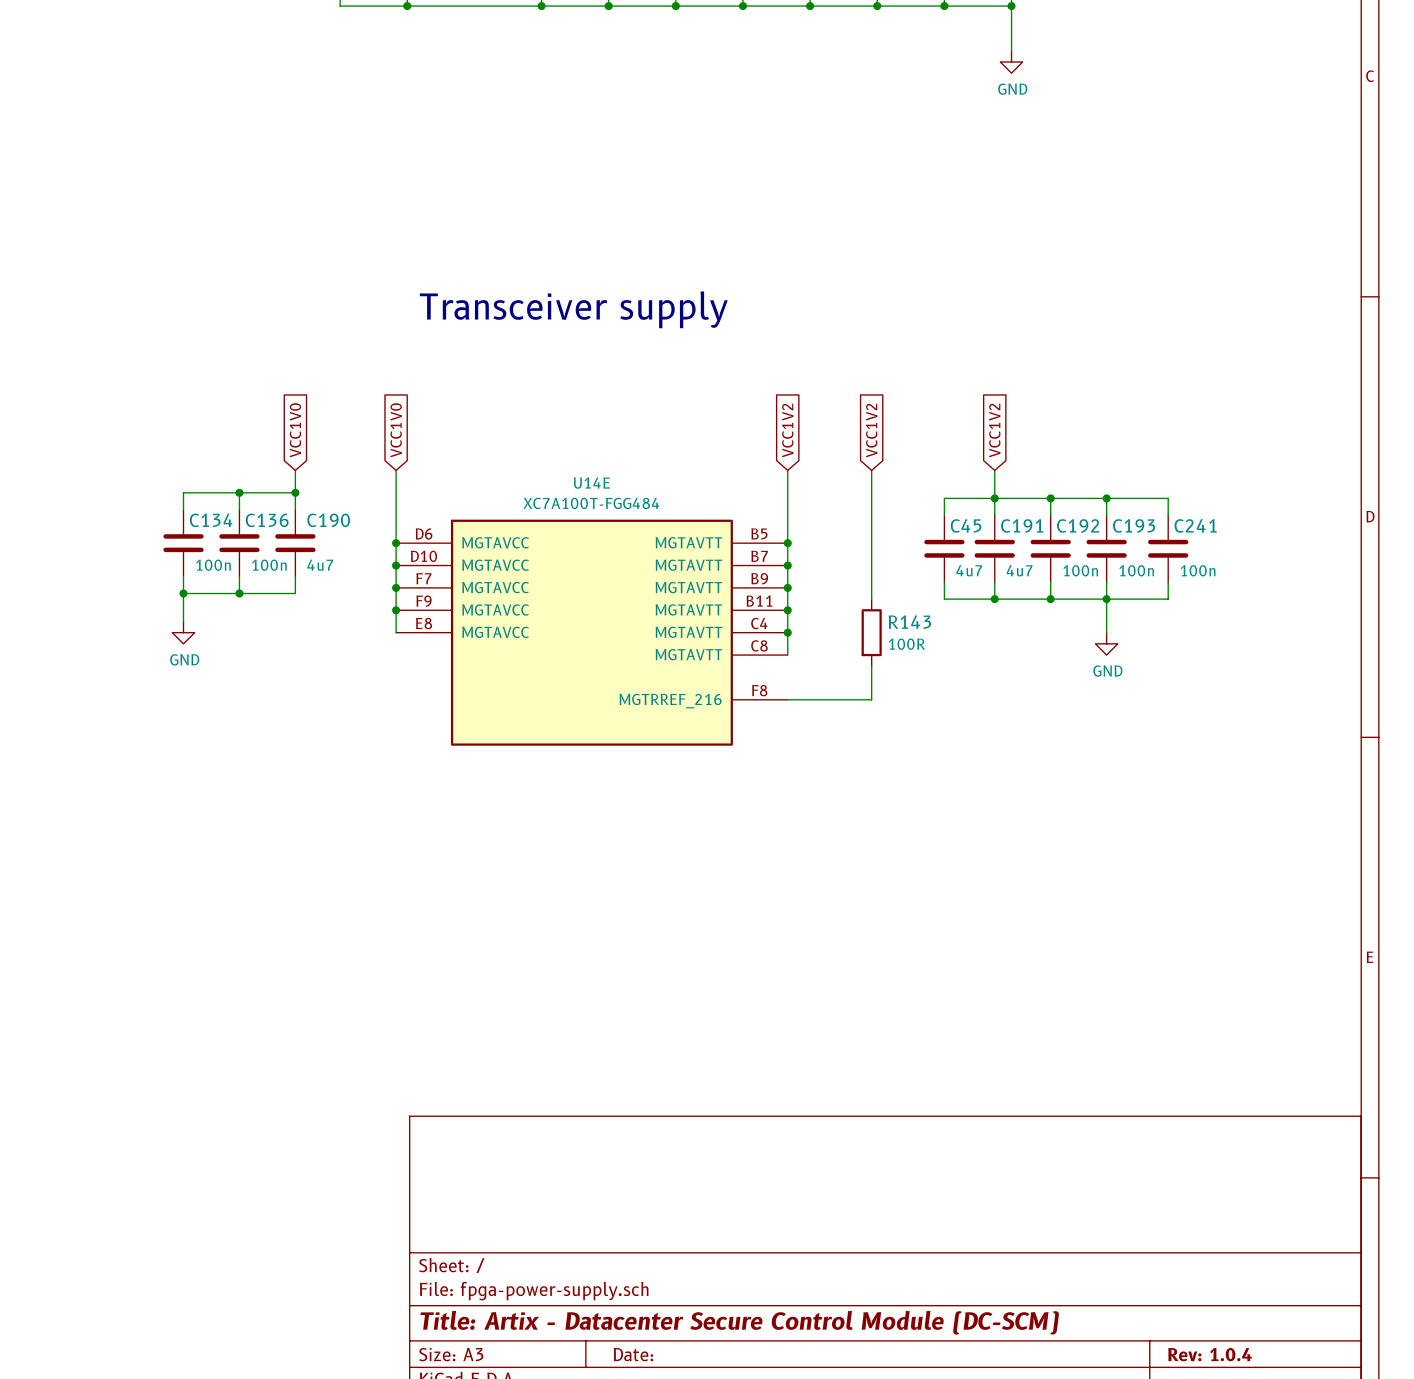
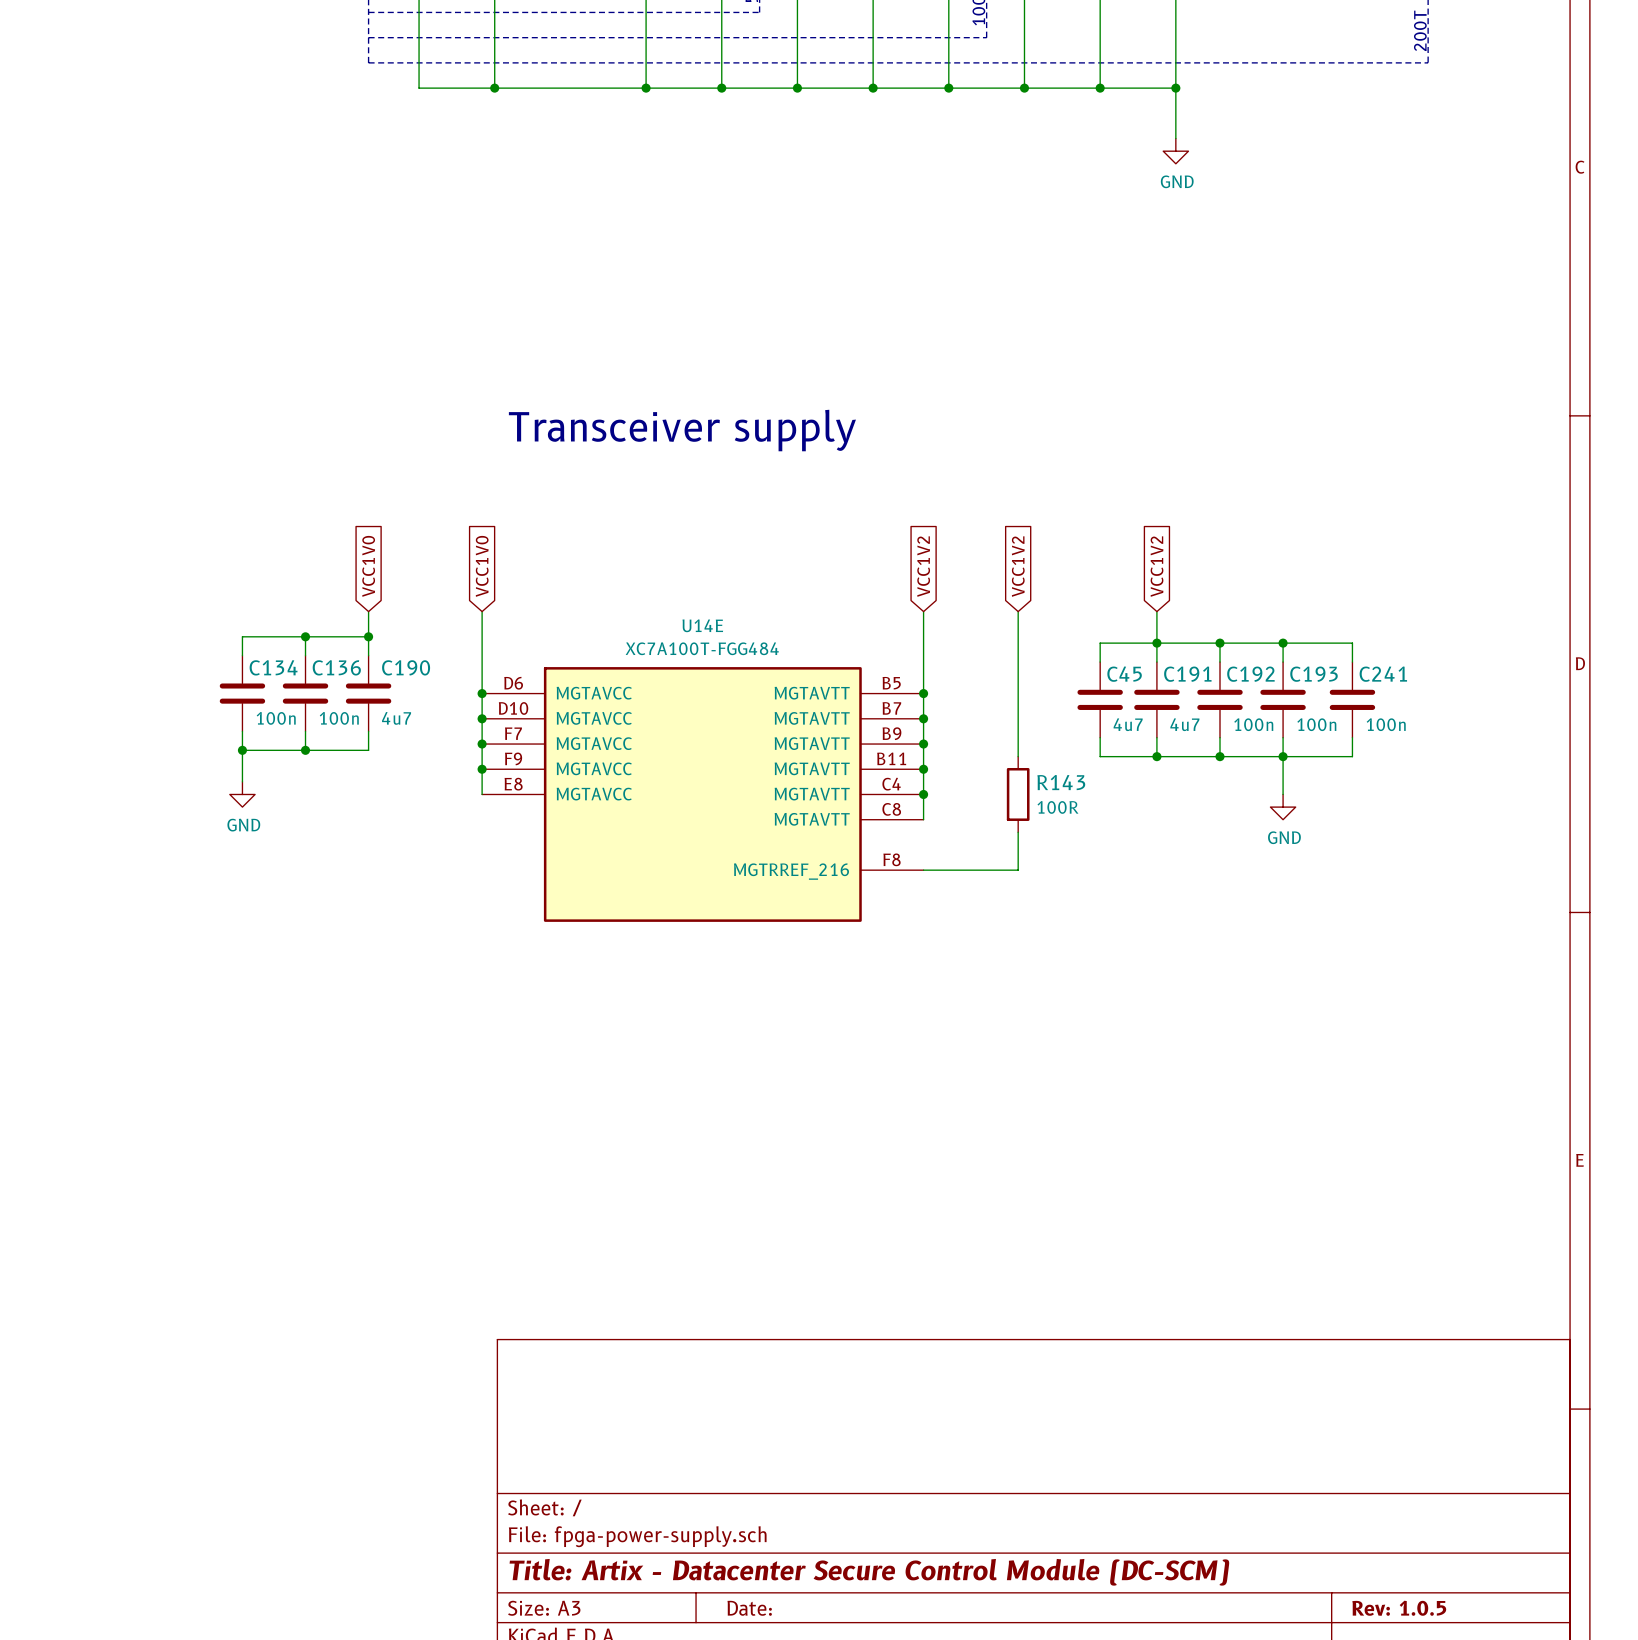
title block: Rev: 1.0.4 (1210, 1354) -> Rev: 1.0.5 (1399, 1608)

